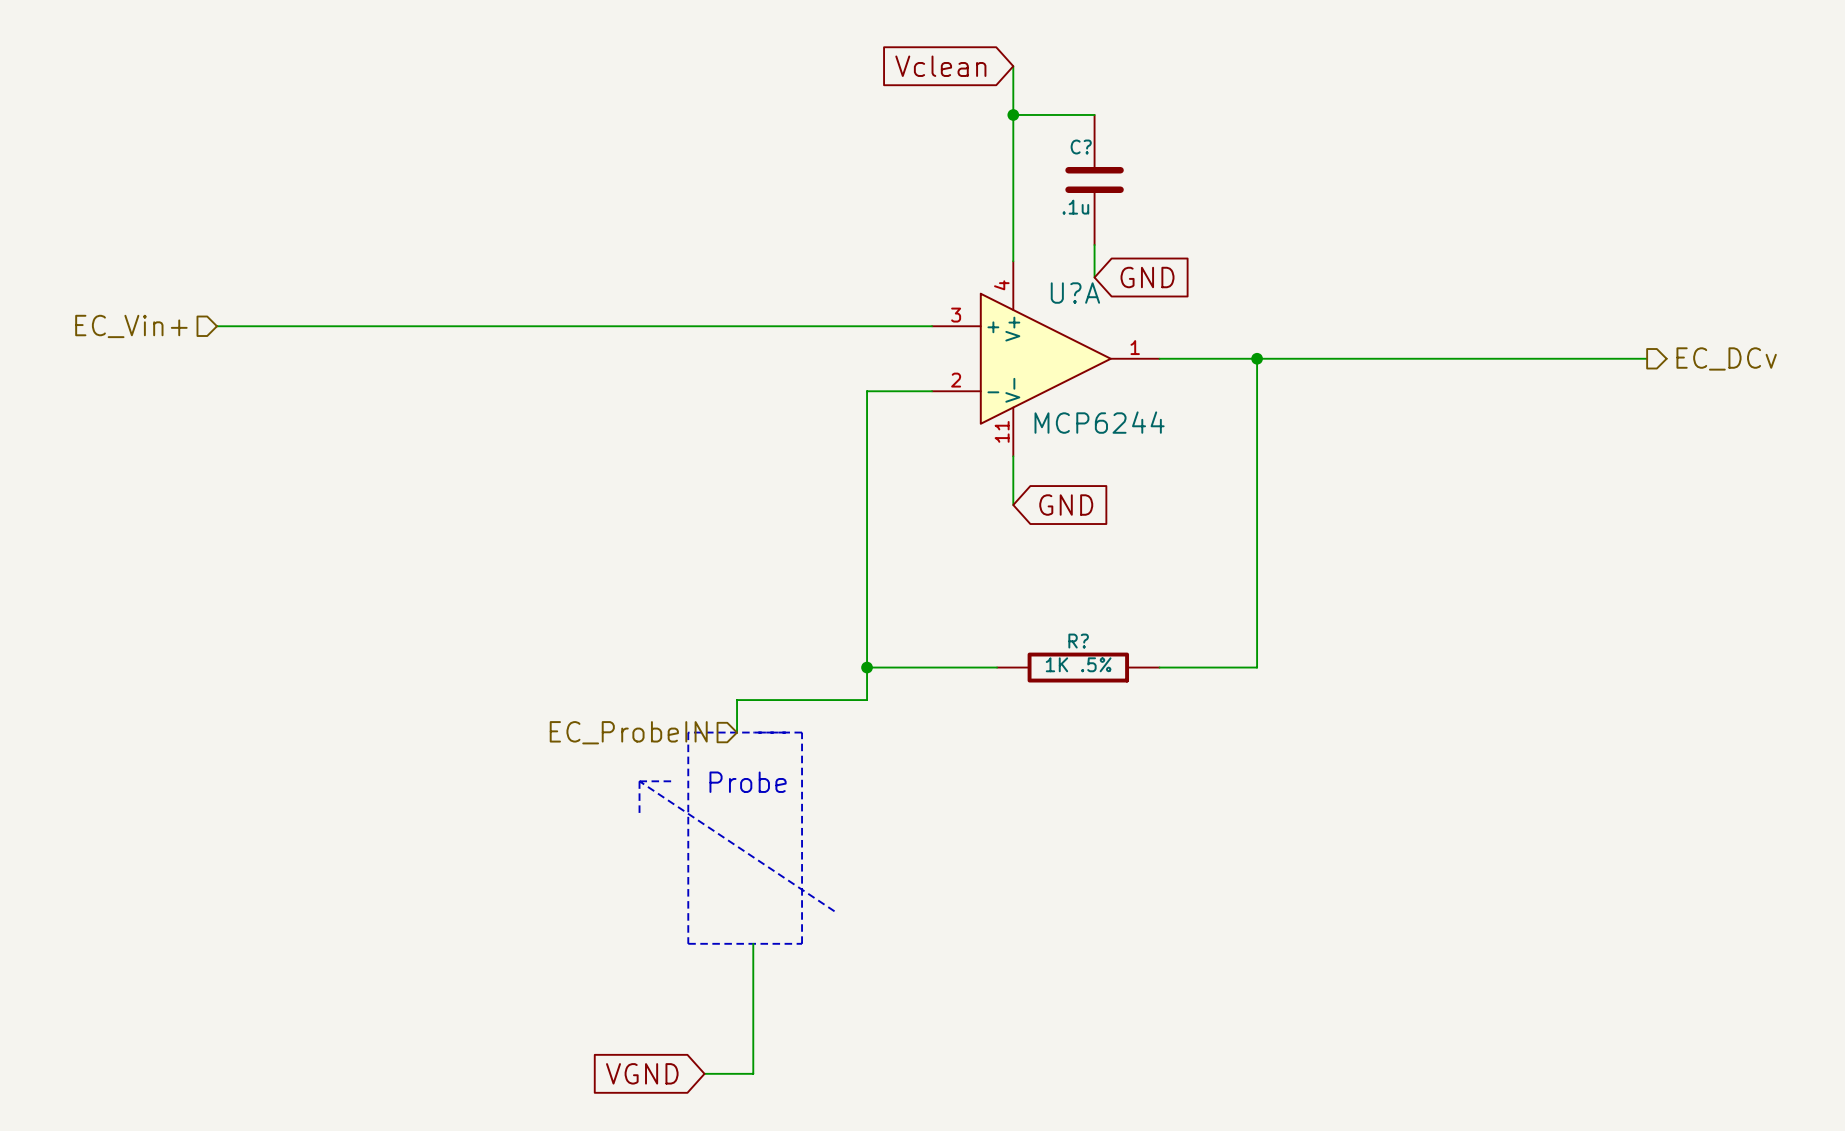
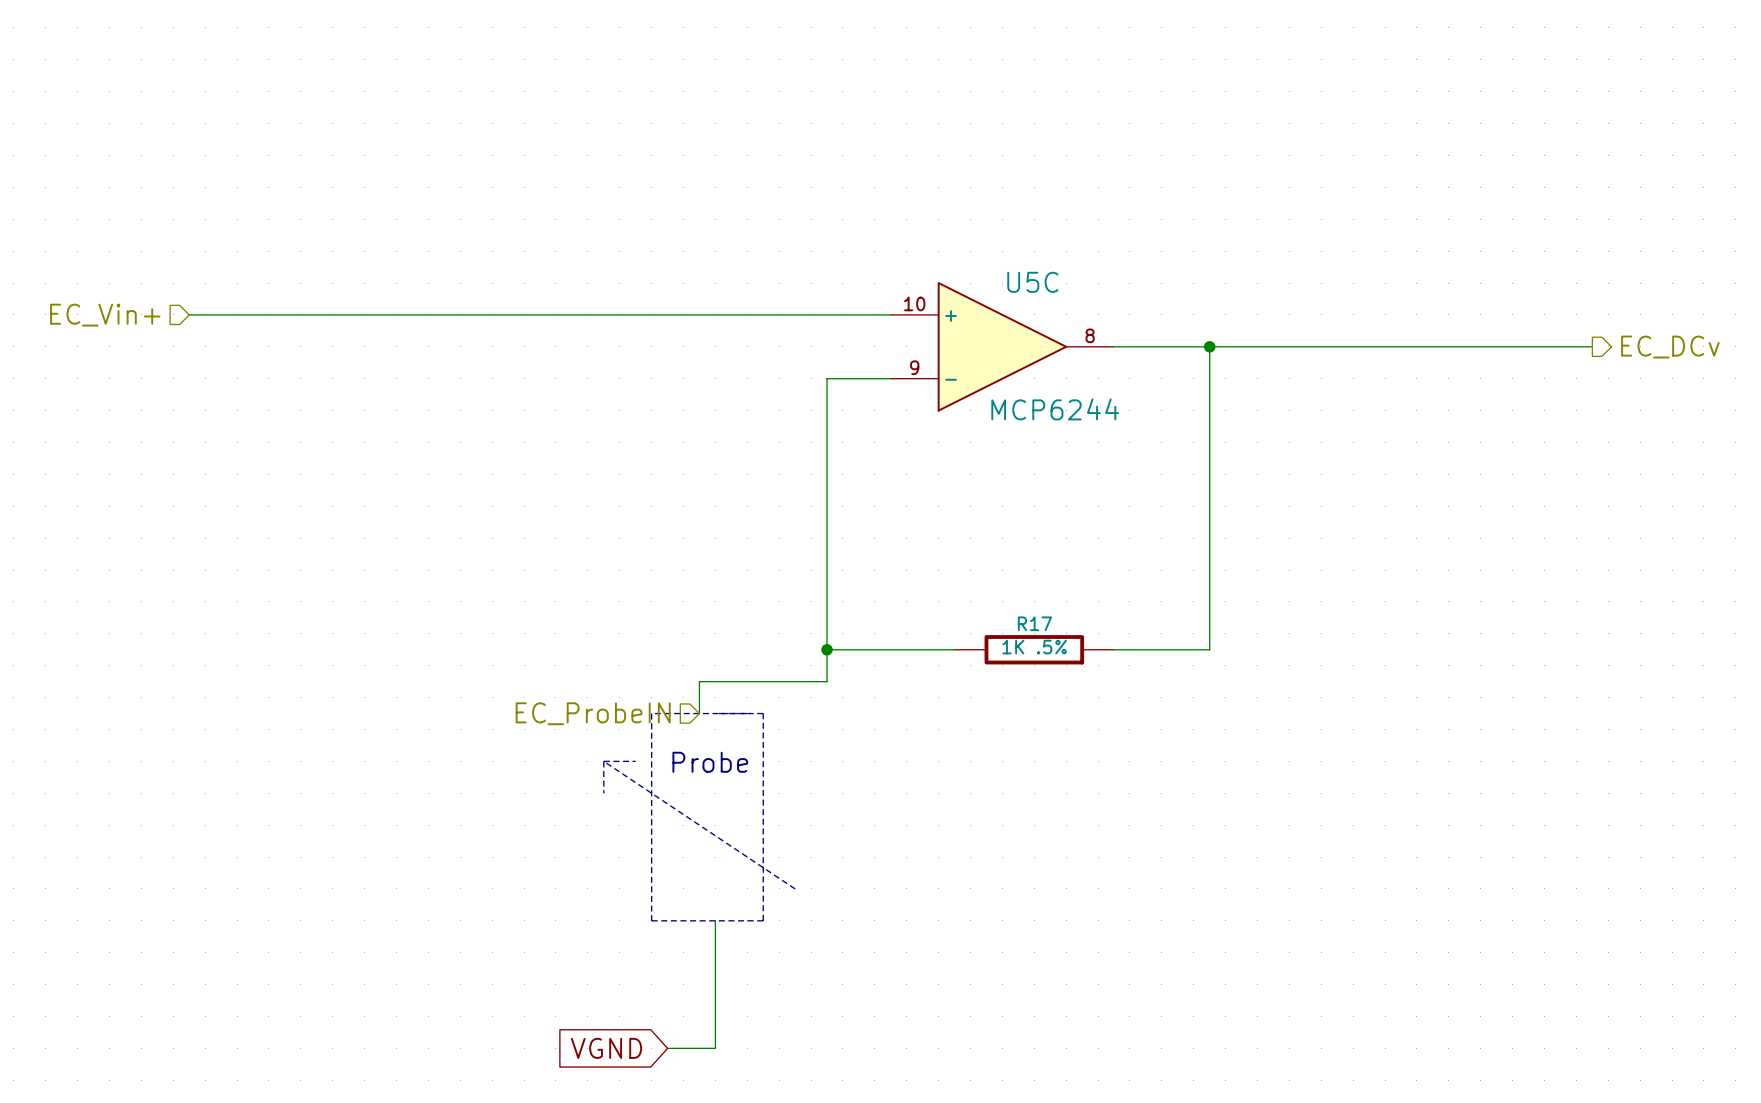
global label: Vclean (940, 66) -> none
wire: (1013, 66) (1013, 261) -> none
wire: (1013, 114) (1094, 114) -> none
junction: (1013, 114) -> none
C?: .1u (1094, 179) -> none
wire: (1094, 245) (1094, 277) -> none
global label: GND (1147, 277) -> none
U?A: MCP6244 (1045, 358) -> none
U5C: none -> MCP6244 (1002, 346)
wire: (1013, 456) (1013, 505) -> none
global label: GND (1066, 505) -> none
R? name: R? (1078, 641) -> R17 (1034, 623)

